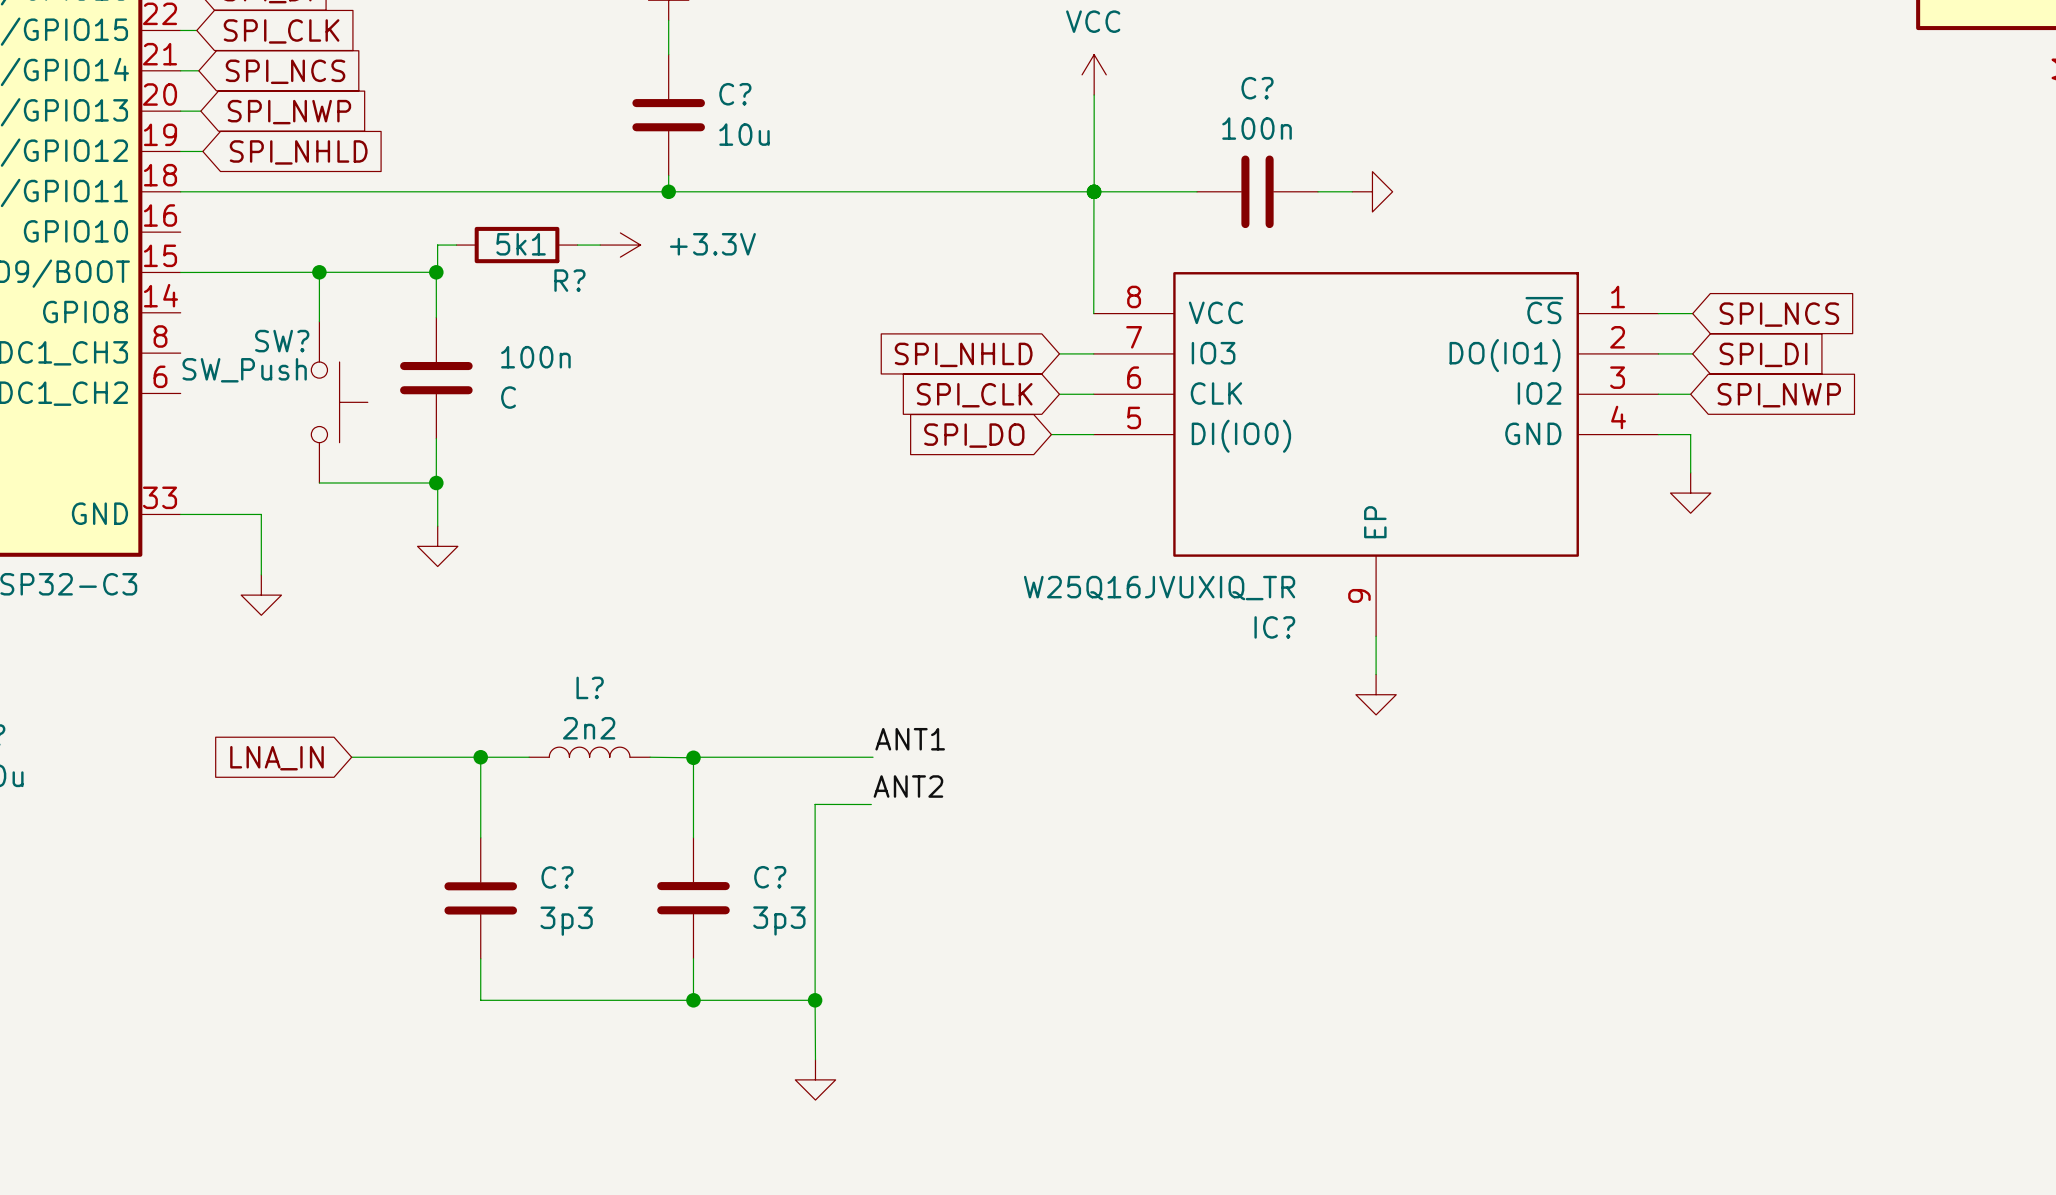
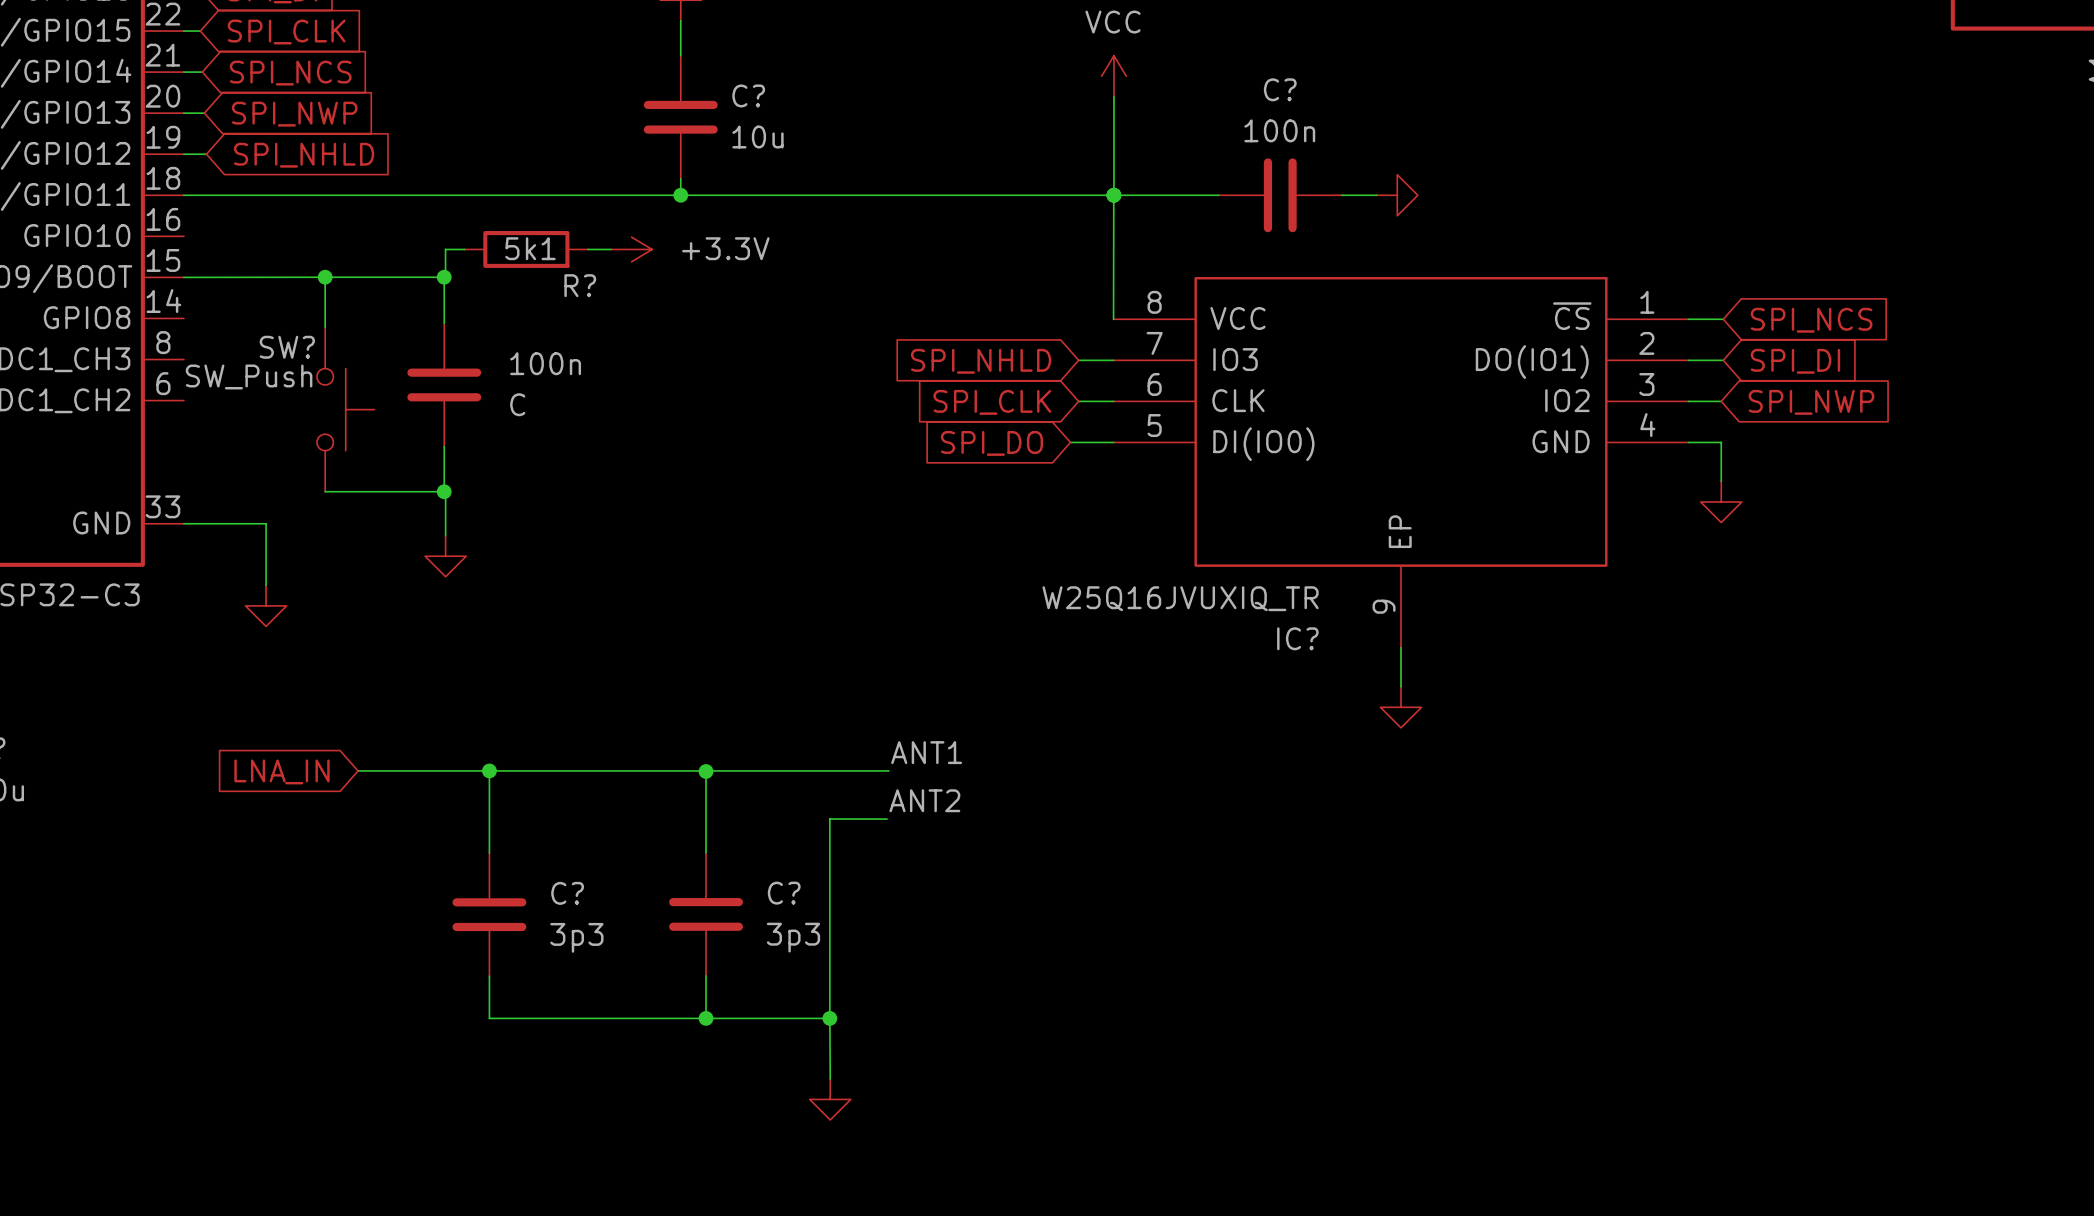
L?: 2n2 (589, 752) -> none
wire: (650, 757) (693, 757) -> (538, 770) (706, 770)

